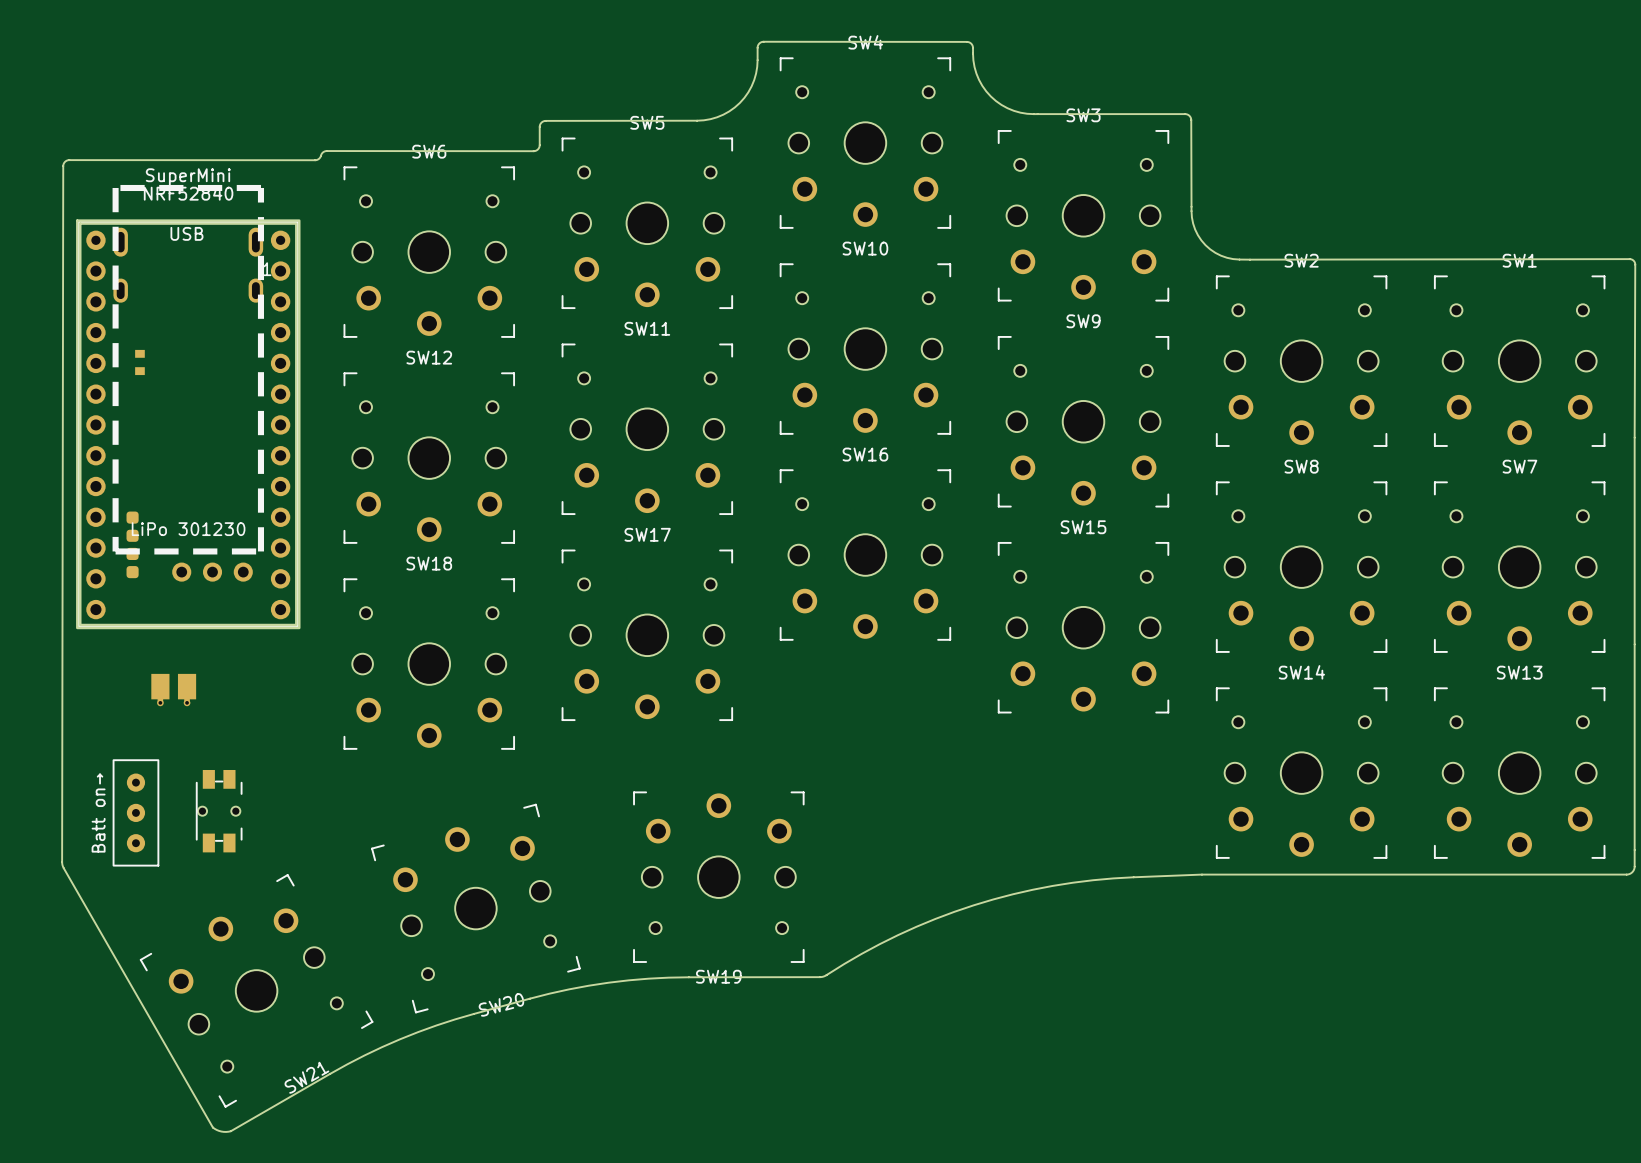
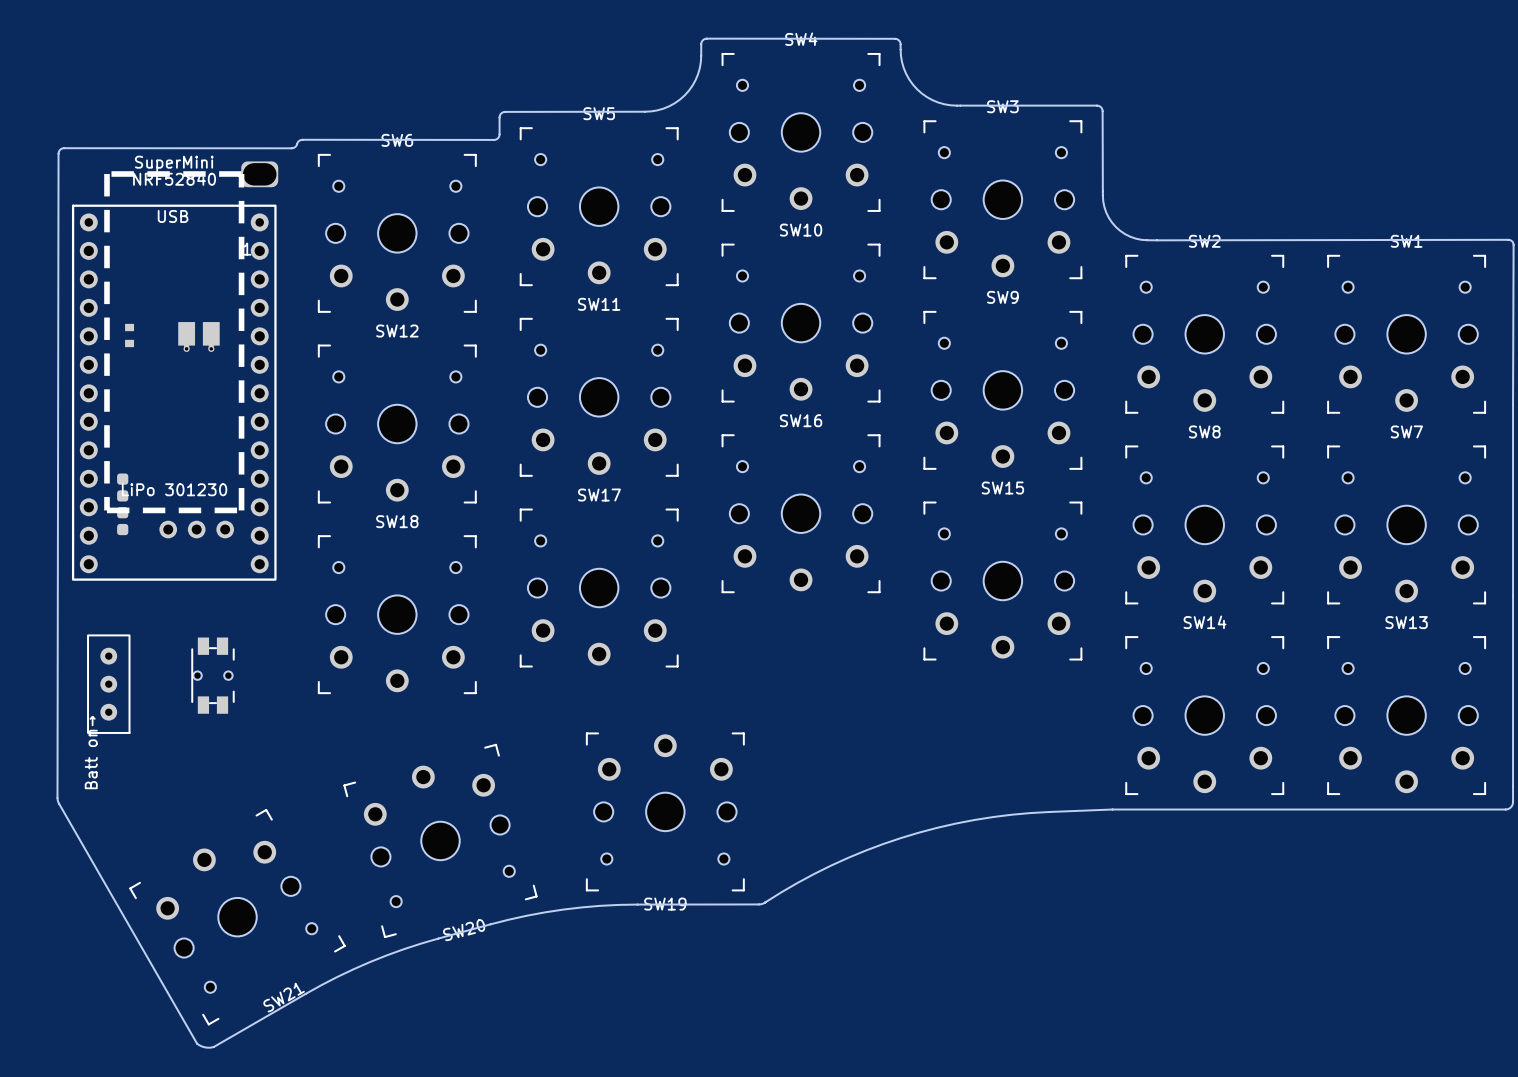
part: none -> (259, 174)
part footprint: [76, 219, 301, 630] -> [71, 204, 277, 581]
part: none -> (198, 337)
part: (173, 690) -> none
part position: (219, 811) -> (212, 675)
part position: (135, 812) -> (108, 684)

